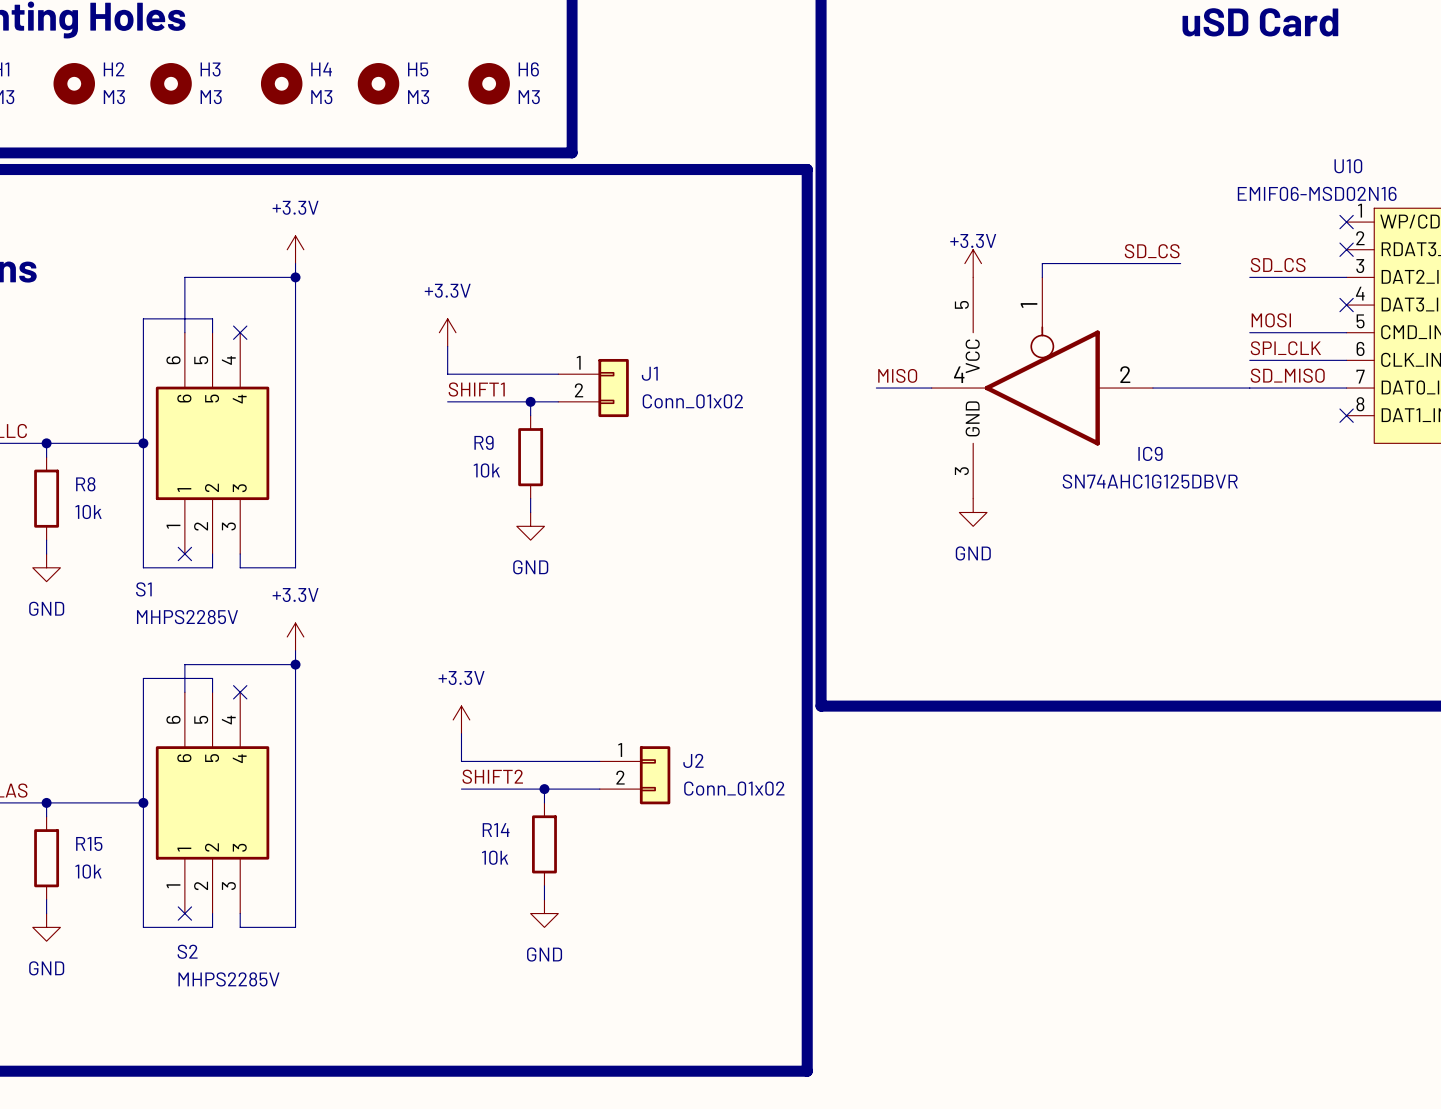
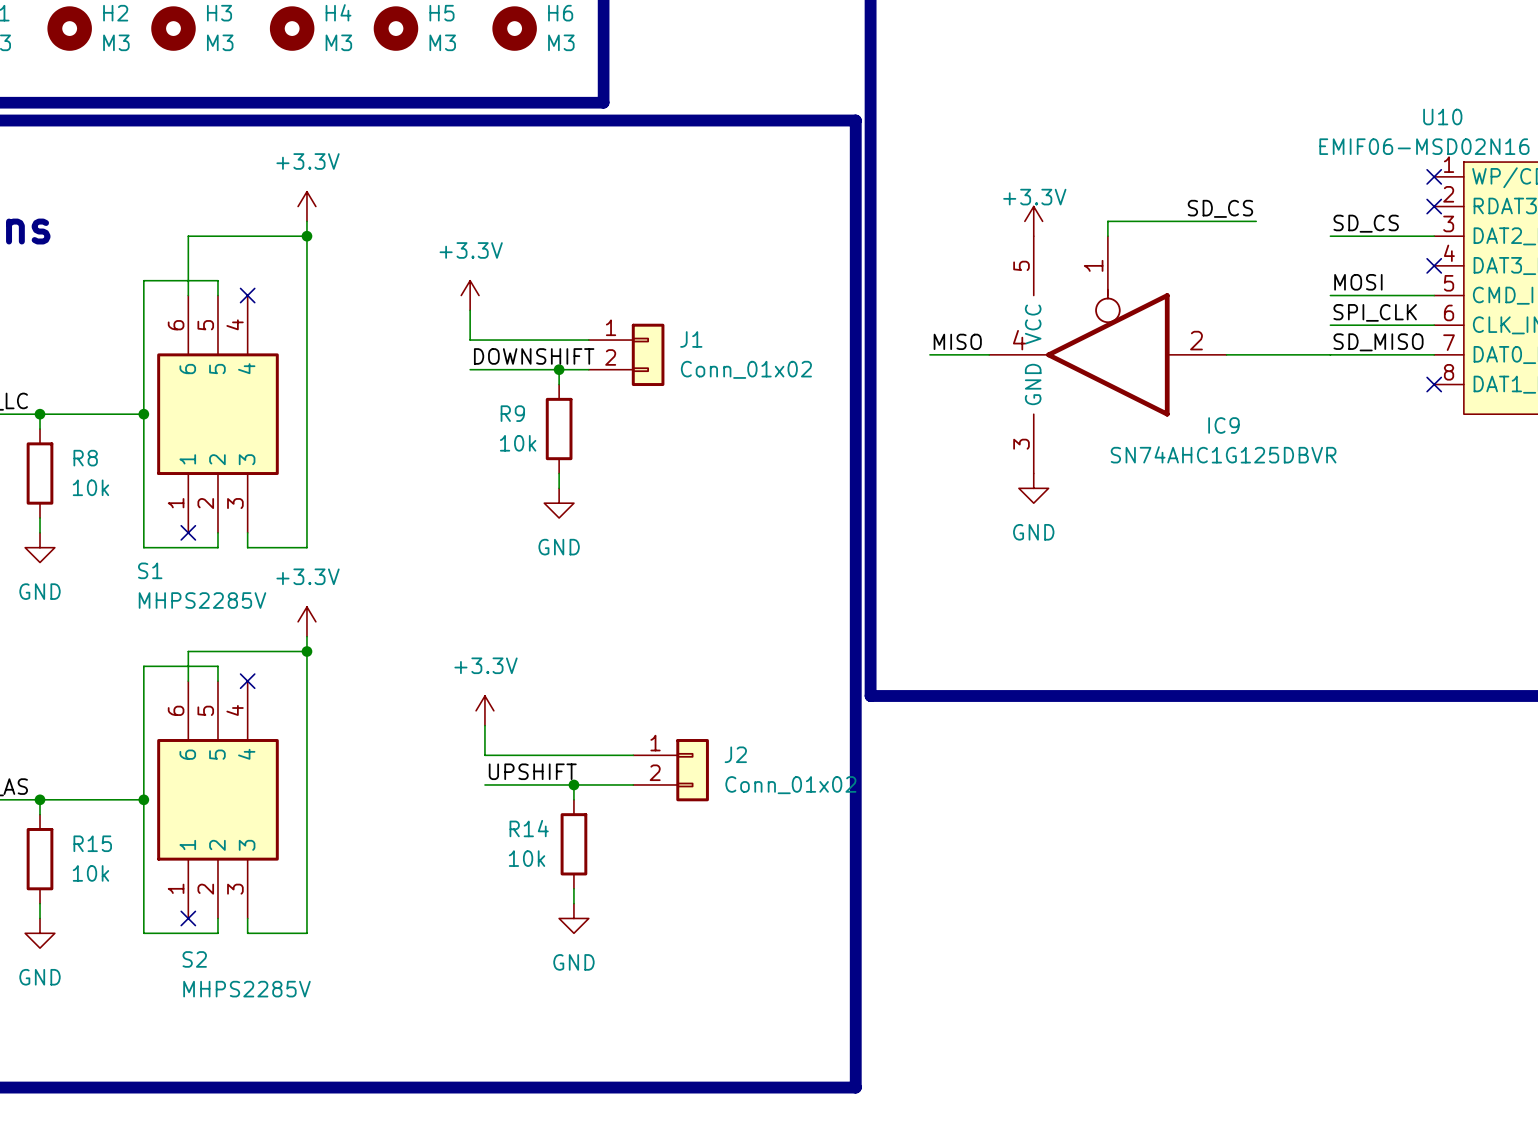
label: SHIFT1 (476, 389) -> DOWNSHIFT (534, 356)
label: SHIFT2 (492, 776) -> UPSHIFT (532, 771)

